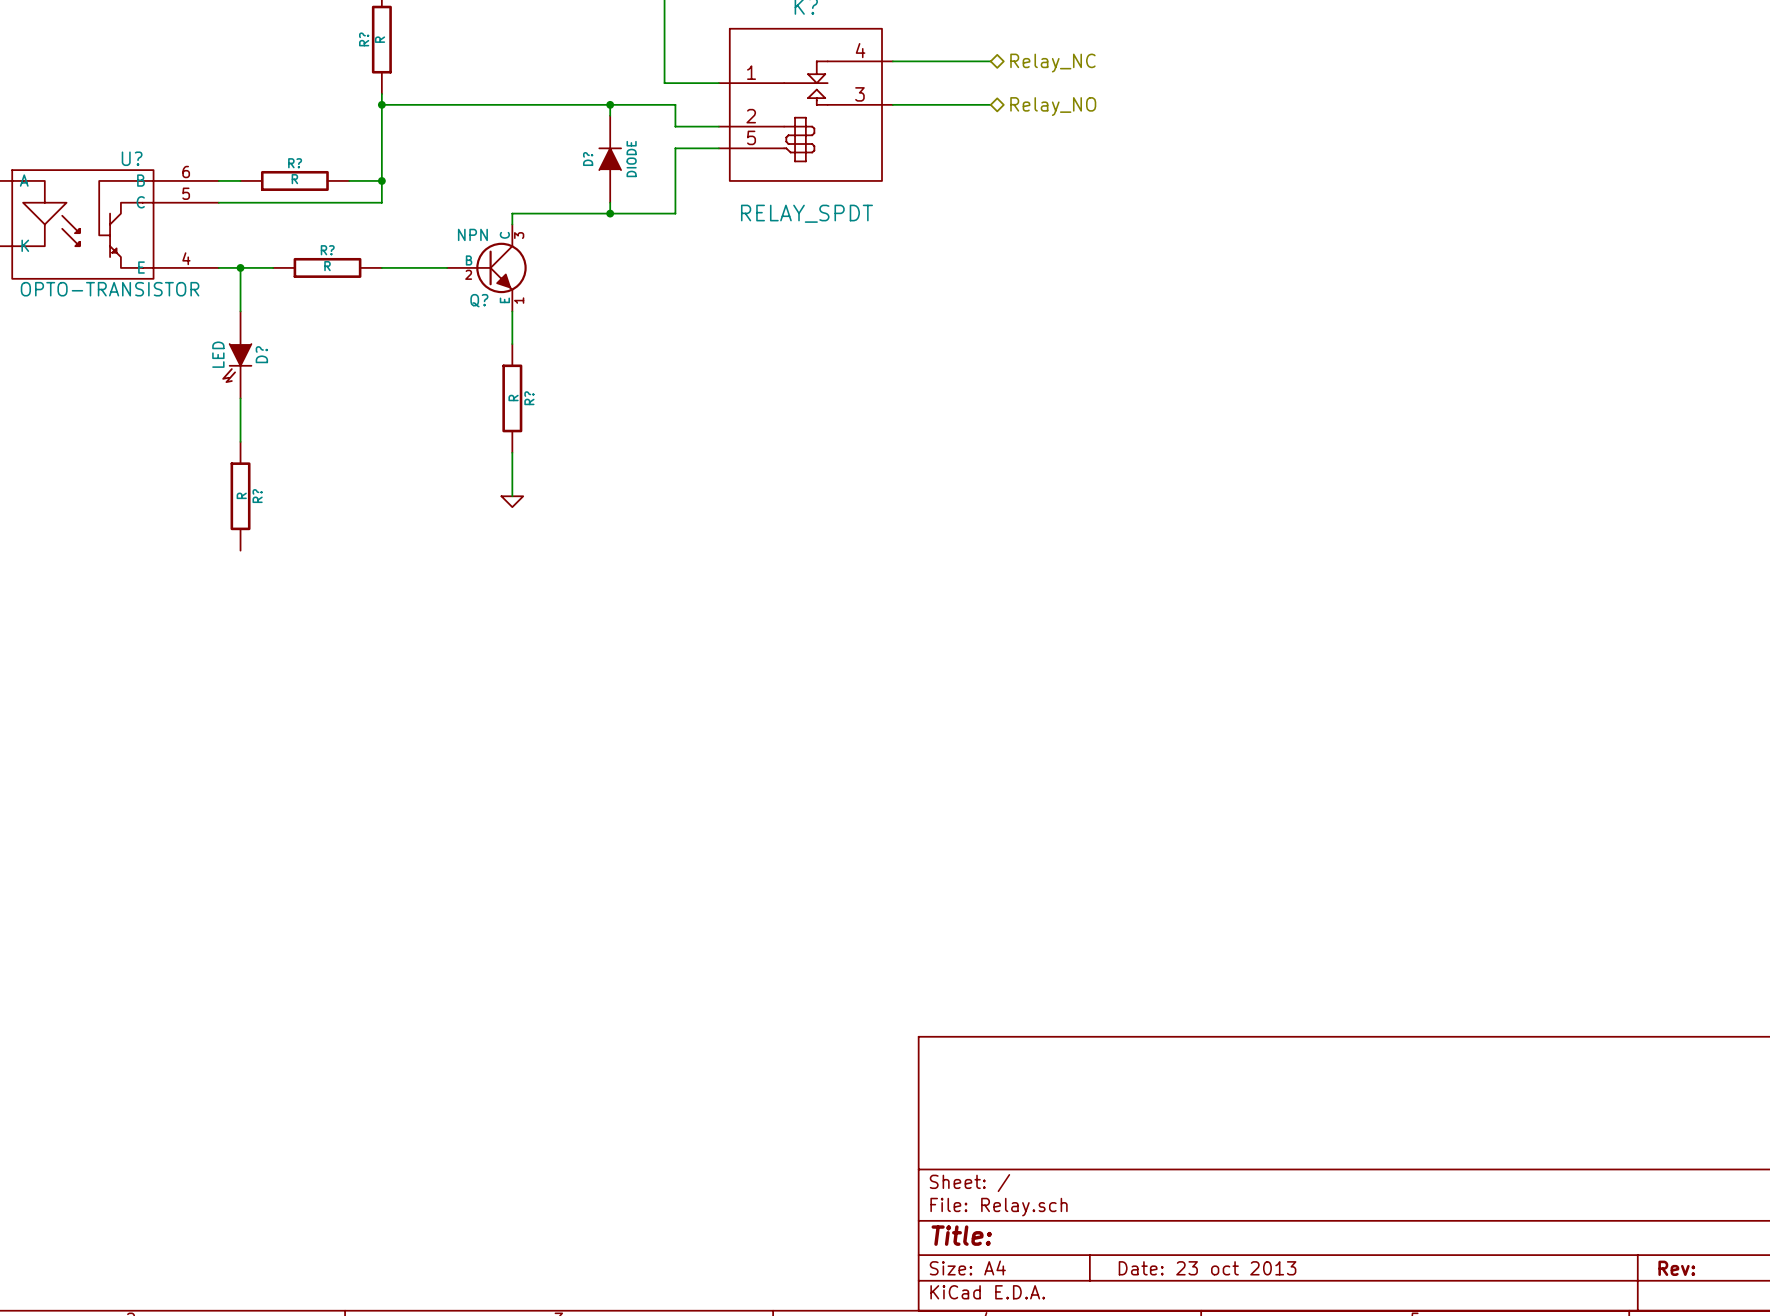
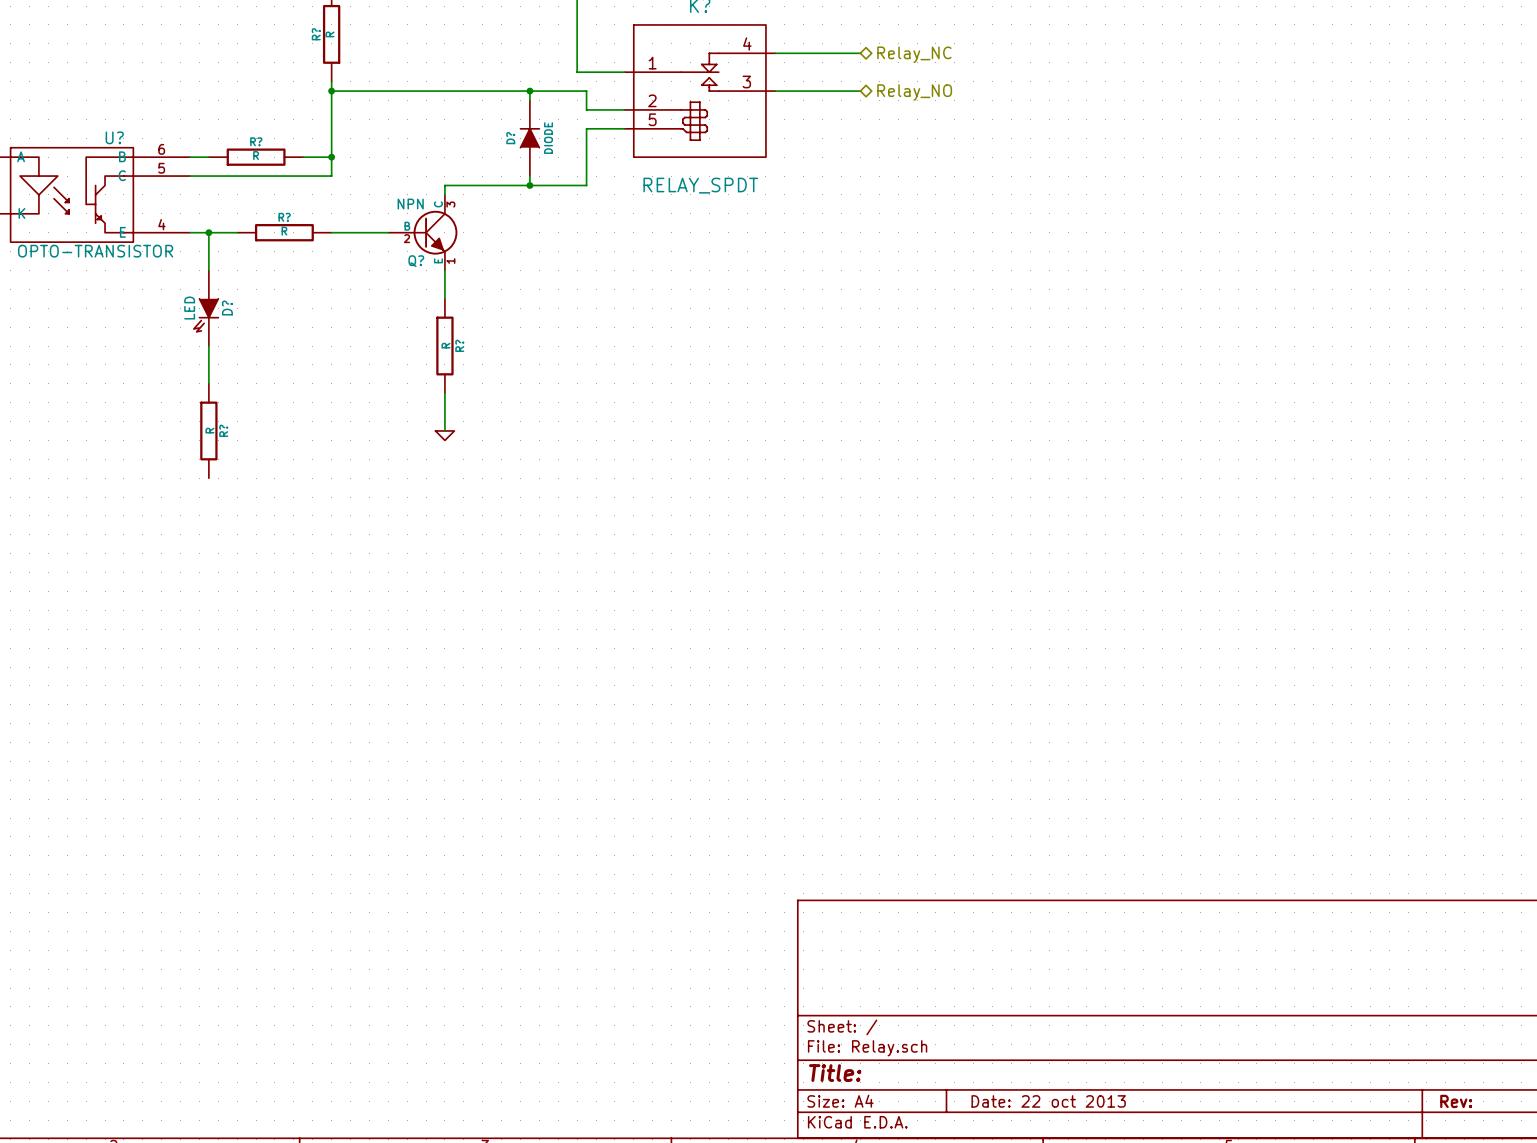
title block: Date: 23 oct 2013 (1207, 1268) -> Date: 22 oct 2013 (1048, 1101)

